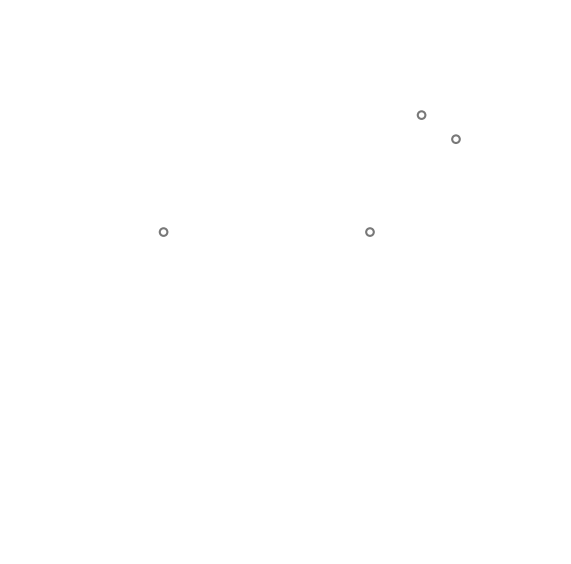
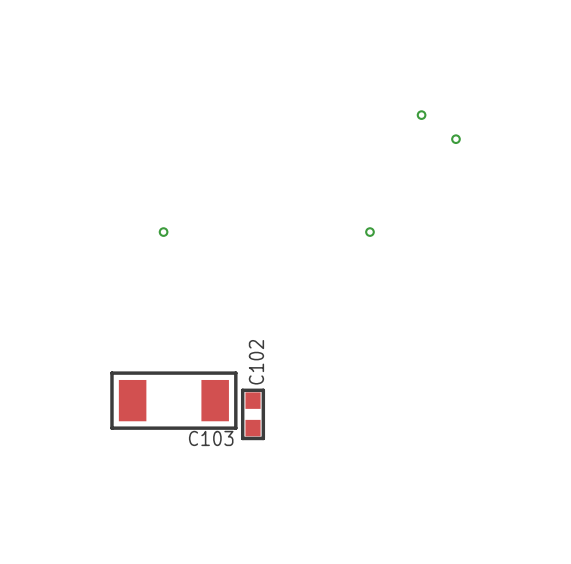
C103: none -> (173, 400)
C102: none -> (253, 414)

